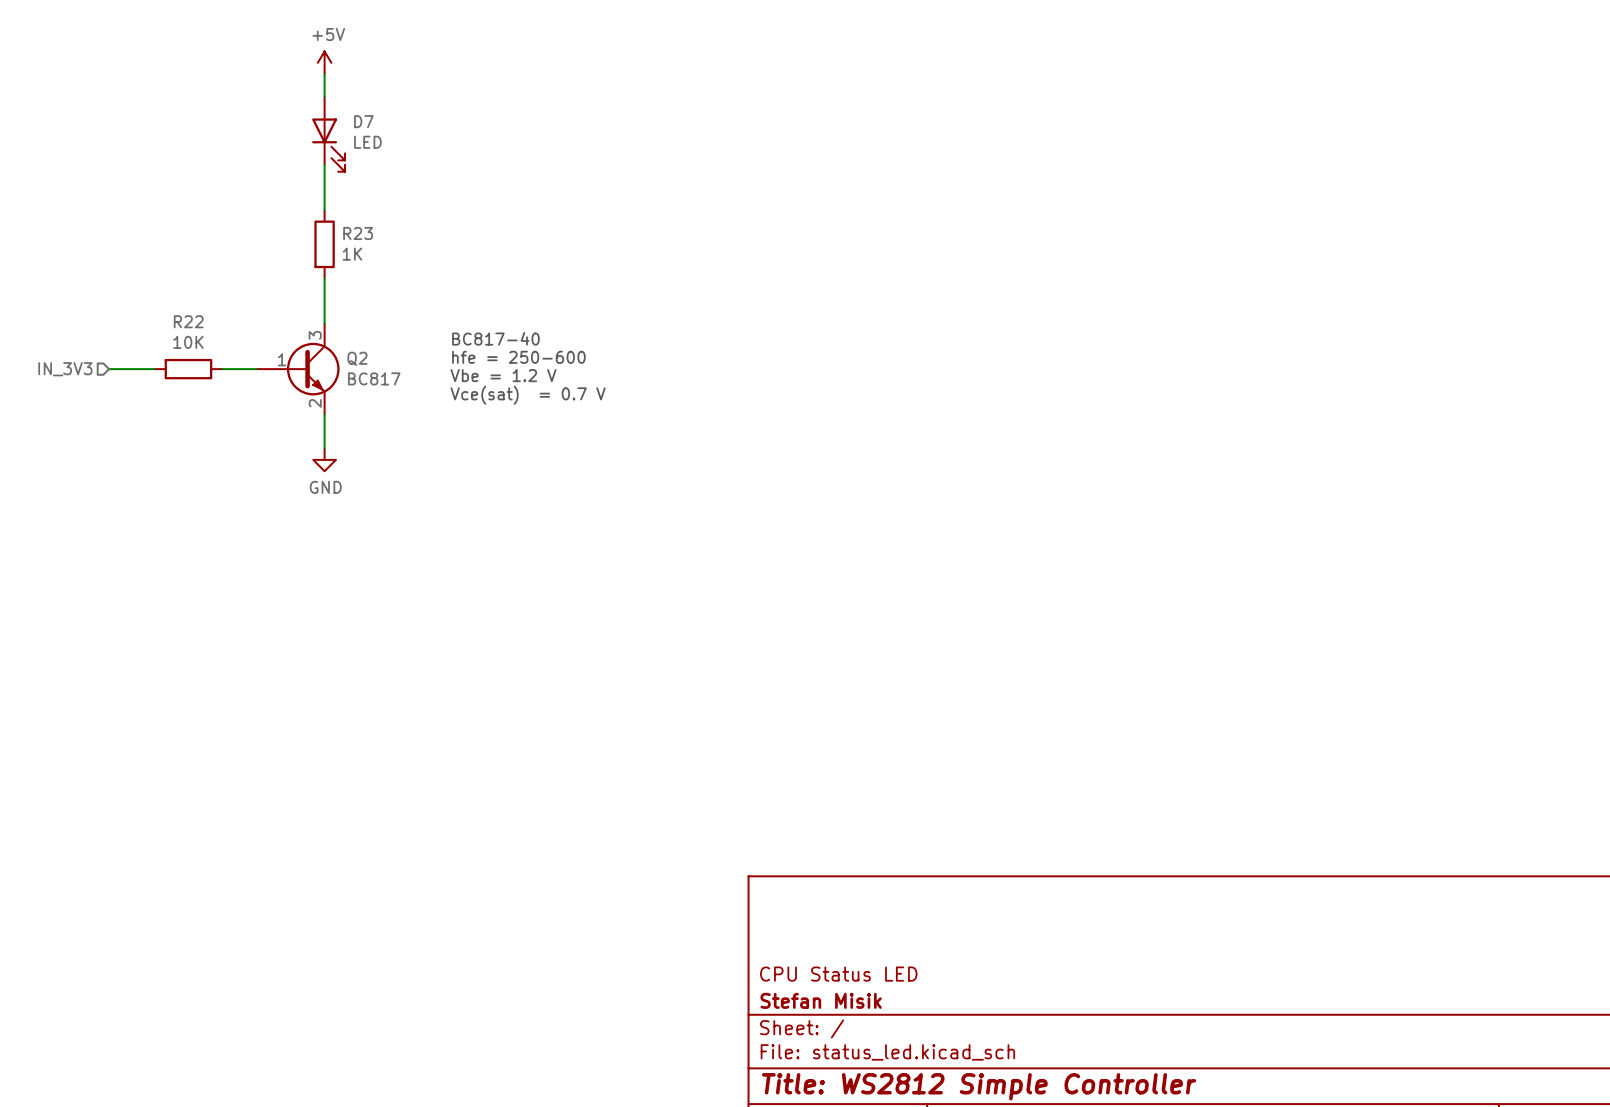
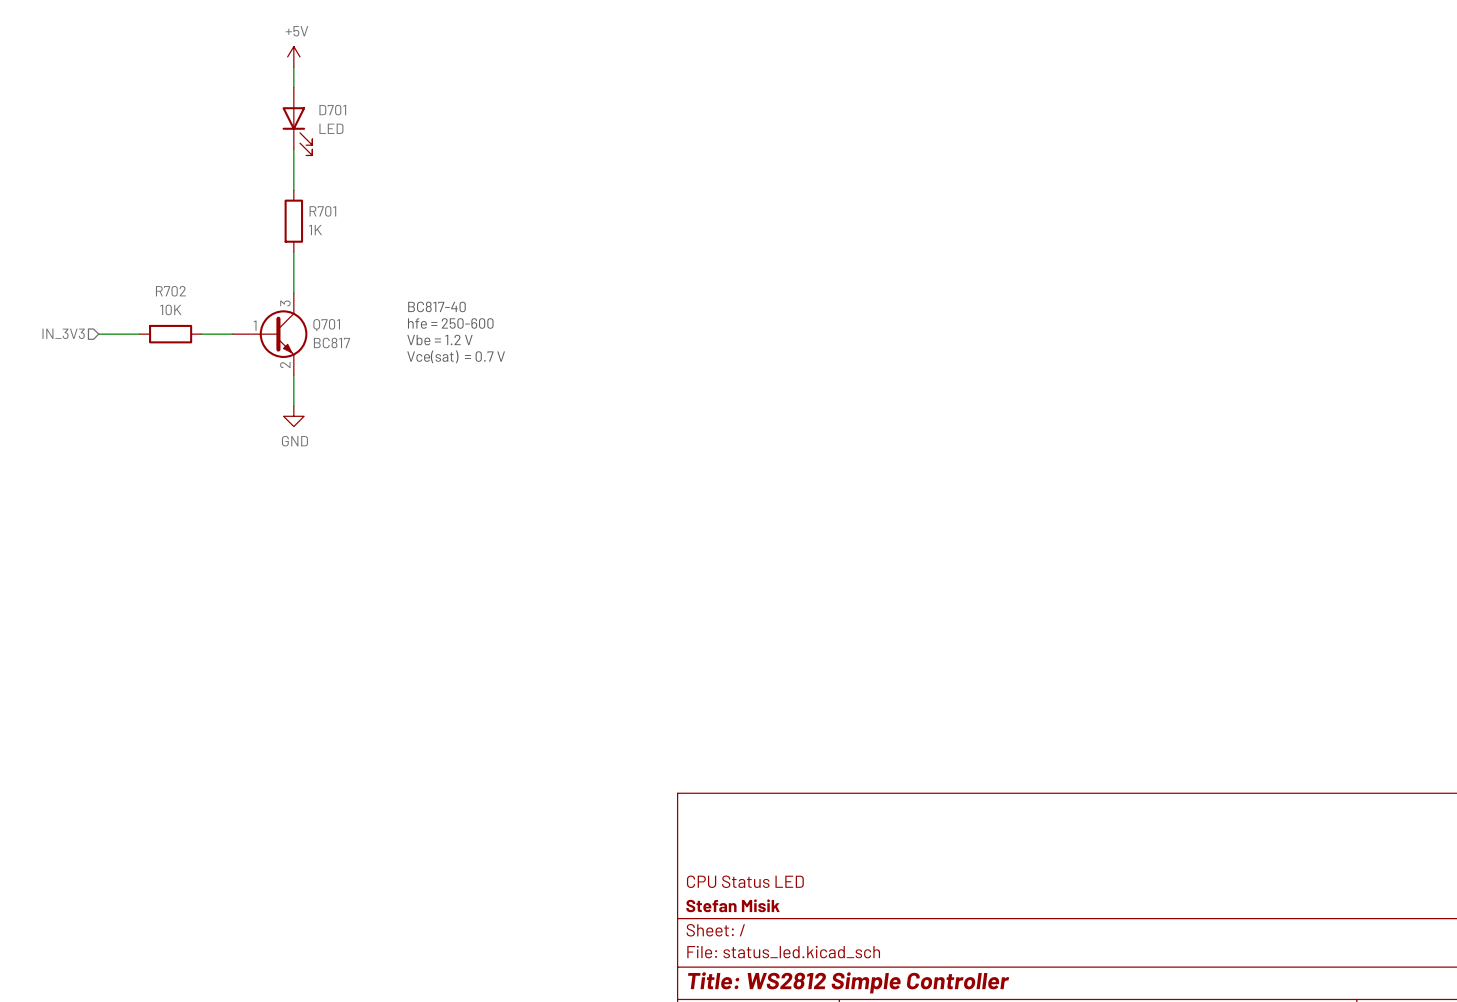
D7 name: D7 (363, 121) -> D701 (332, 110)
R23 name: R23 (358, 233) -> R701 (322, 211)
R22 name: R22 (188, 321) -> R702 (170, 291)
Q2 name: Q2 (357, 358) -> Q701 (326, 325)

